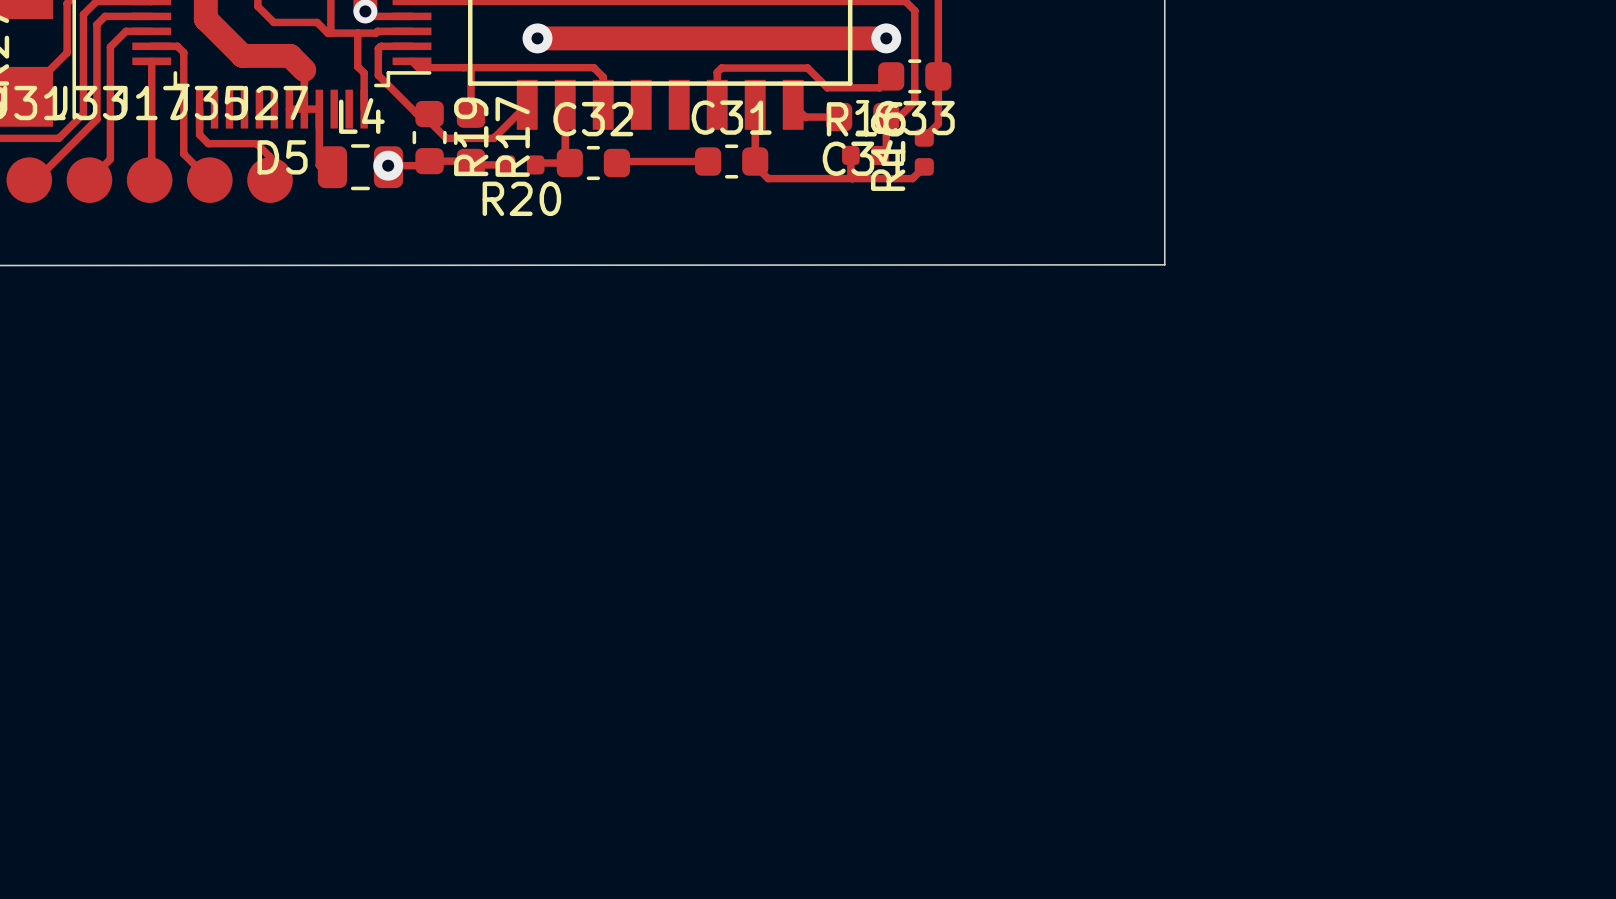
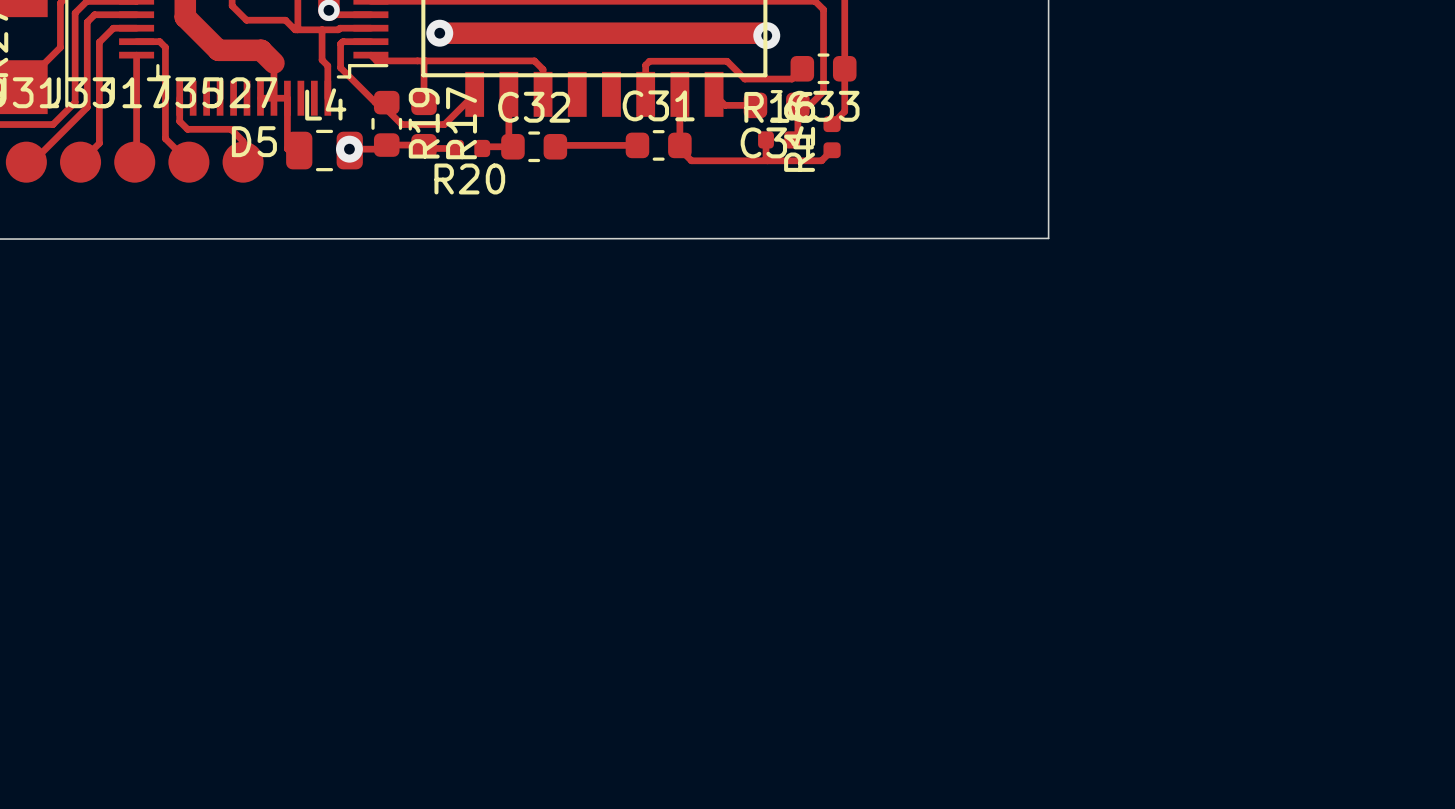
track: none -> (439, 33) (764, 33) (766, 35)
track: (537, 38) (886, 38) -> none
via position: (537, 38) -> (439, 33)
via position: (886, 38) -> (766, 35)

